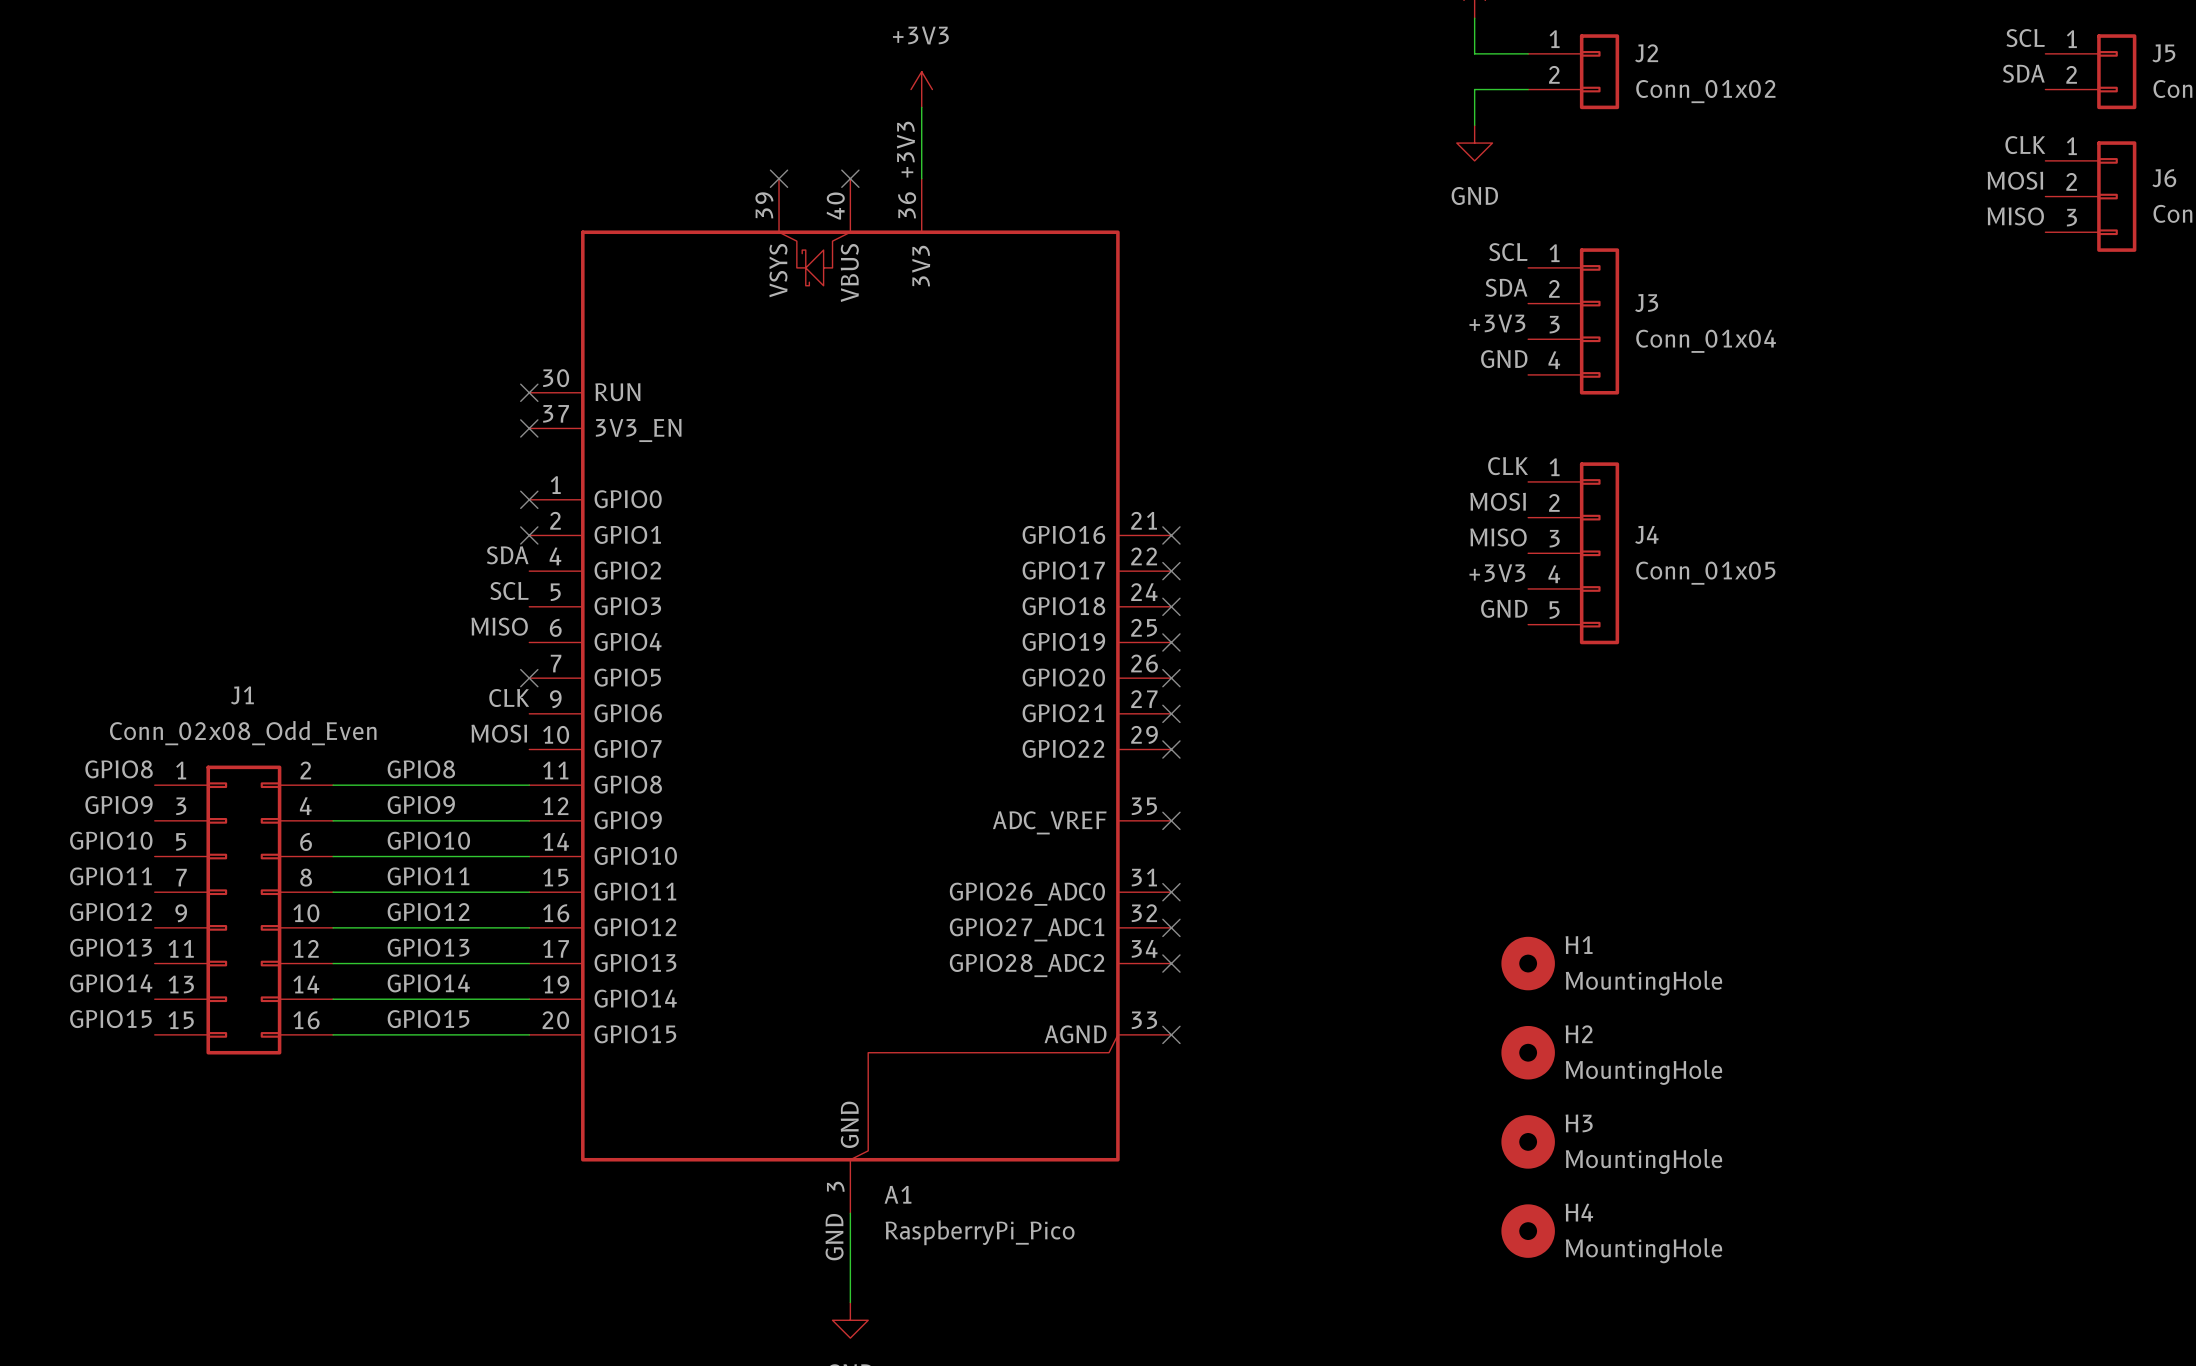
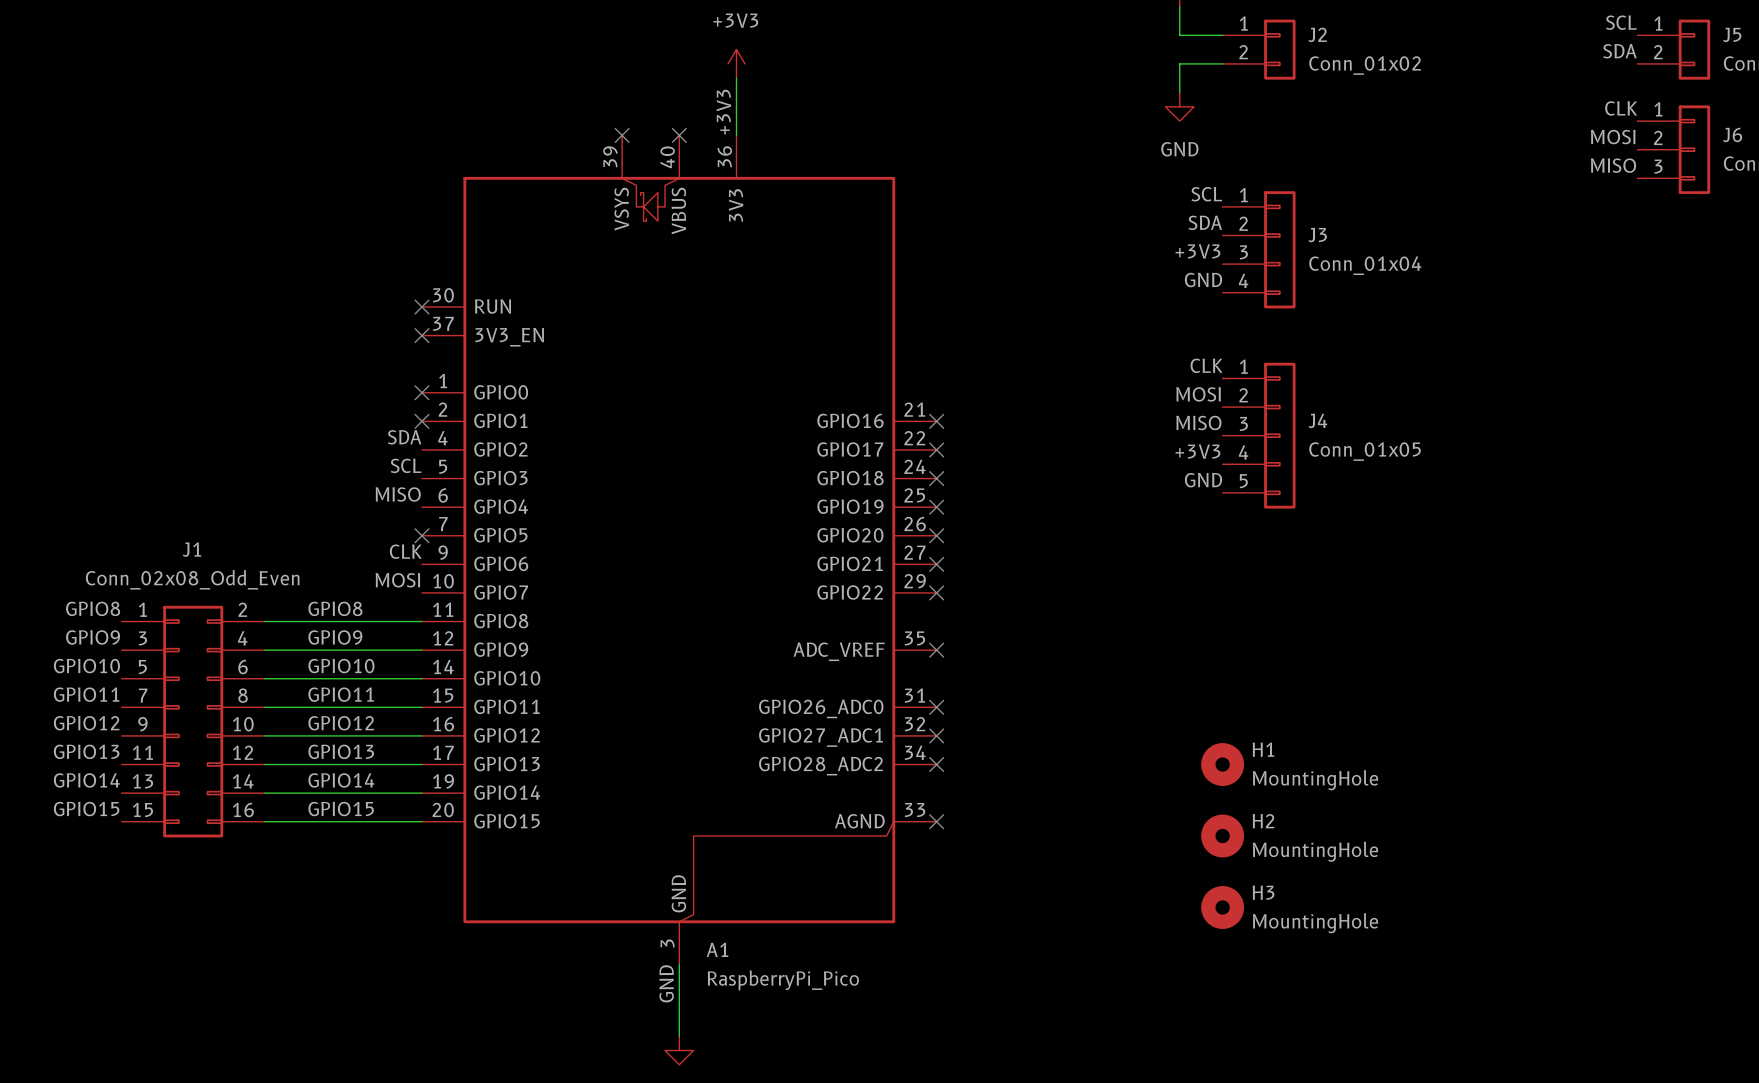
H4: MountingHole (1528, 1231) -> none

